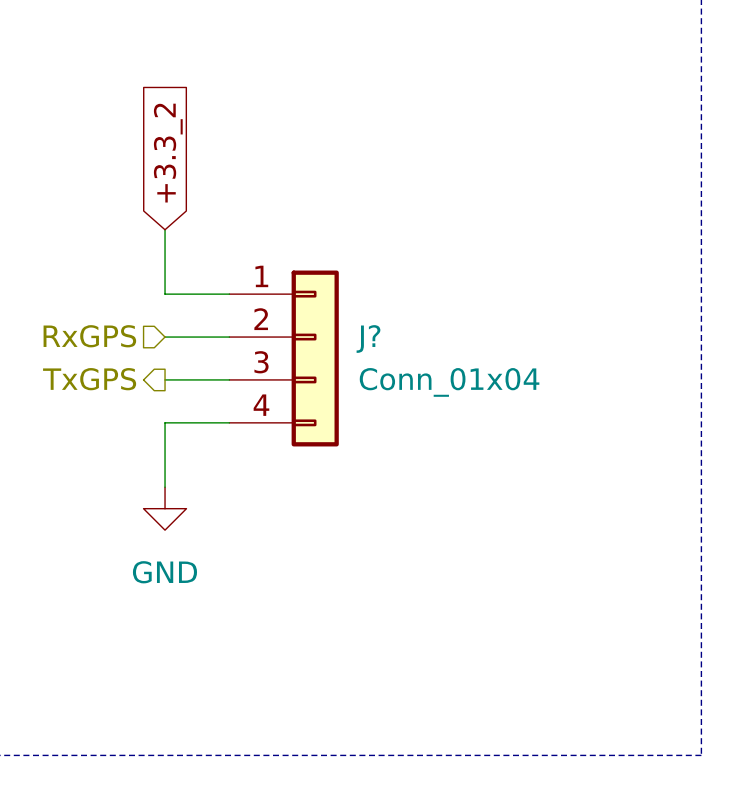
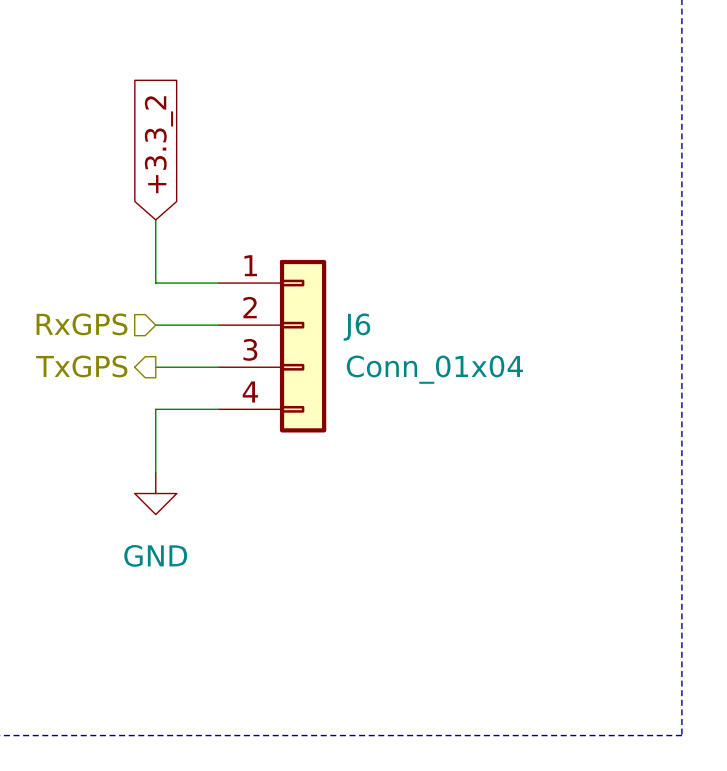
J? name: J? (368, 338) -> J6 (356, 327)

